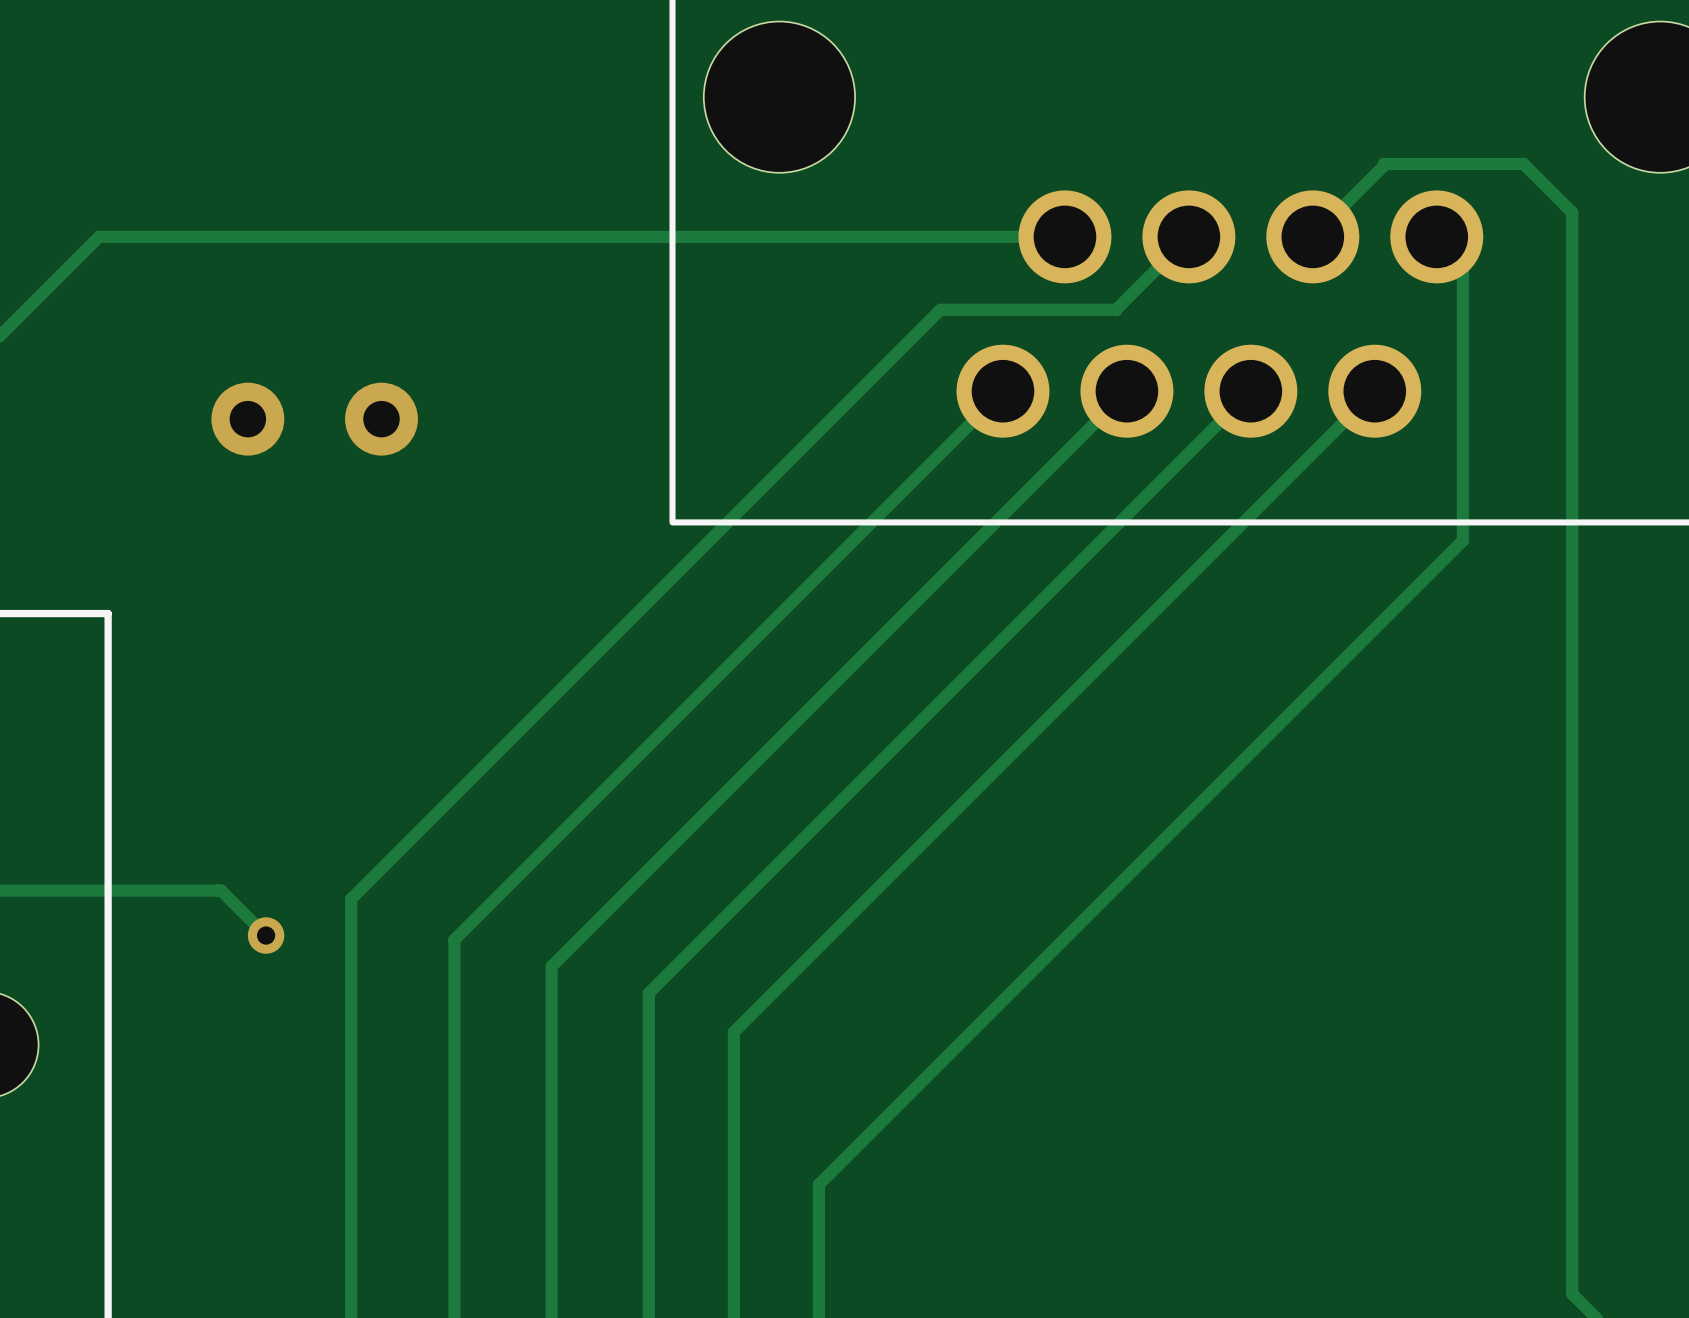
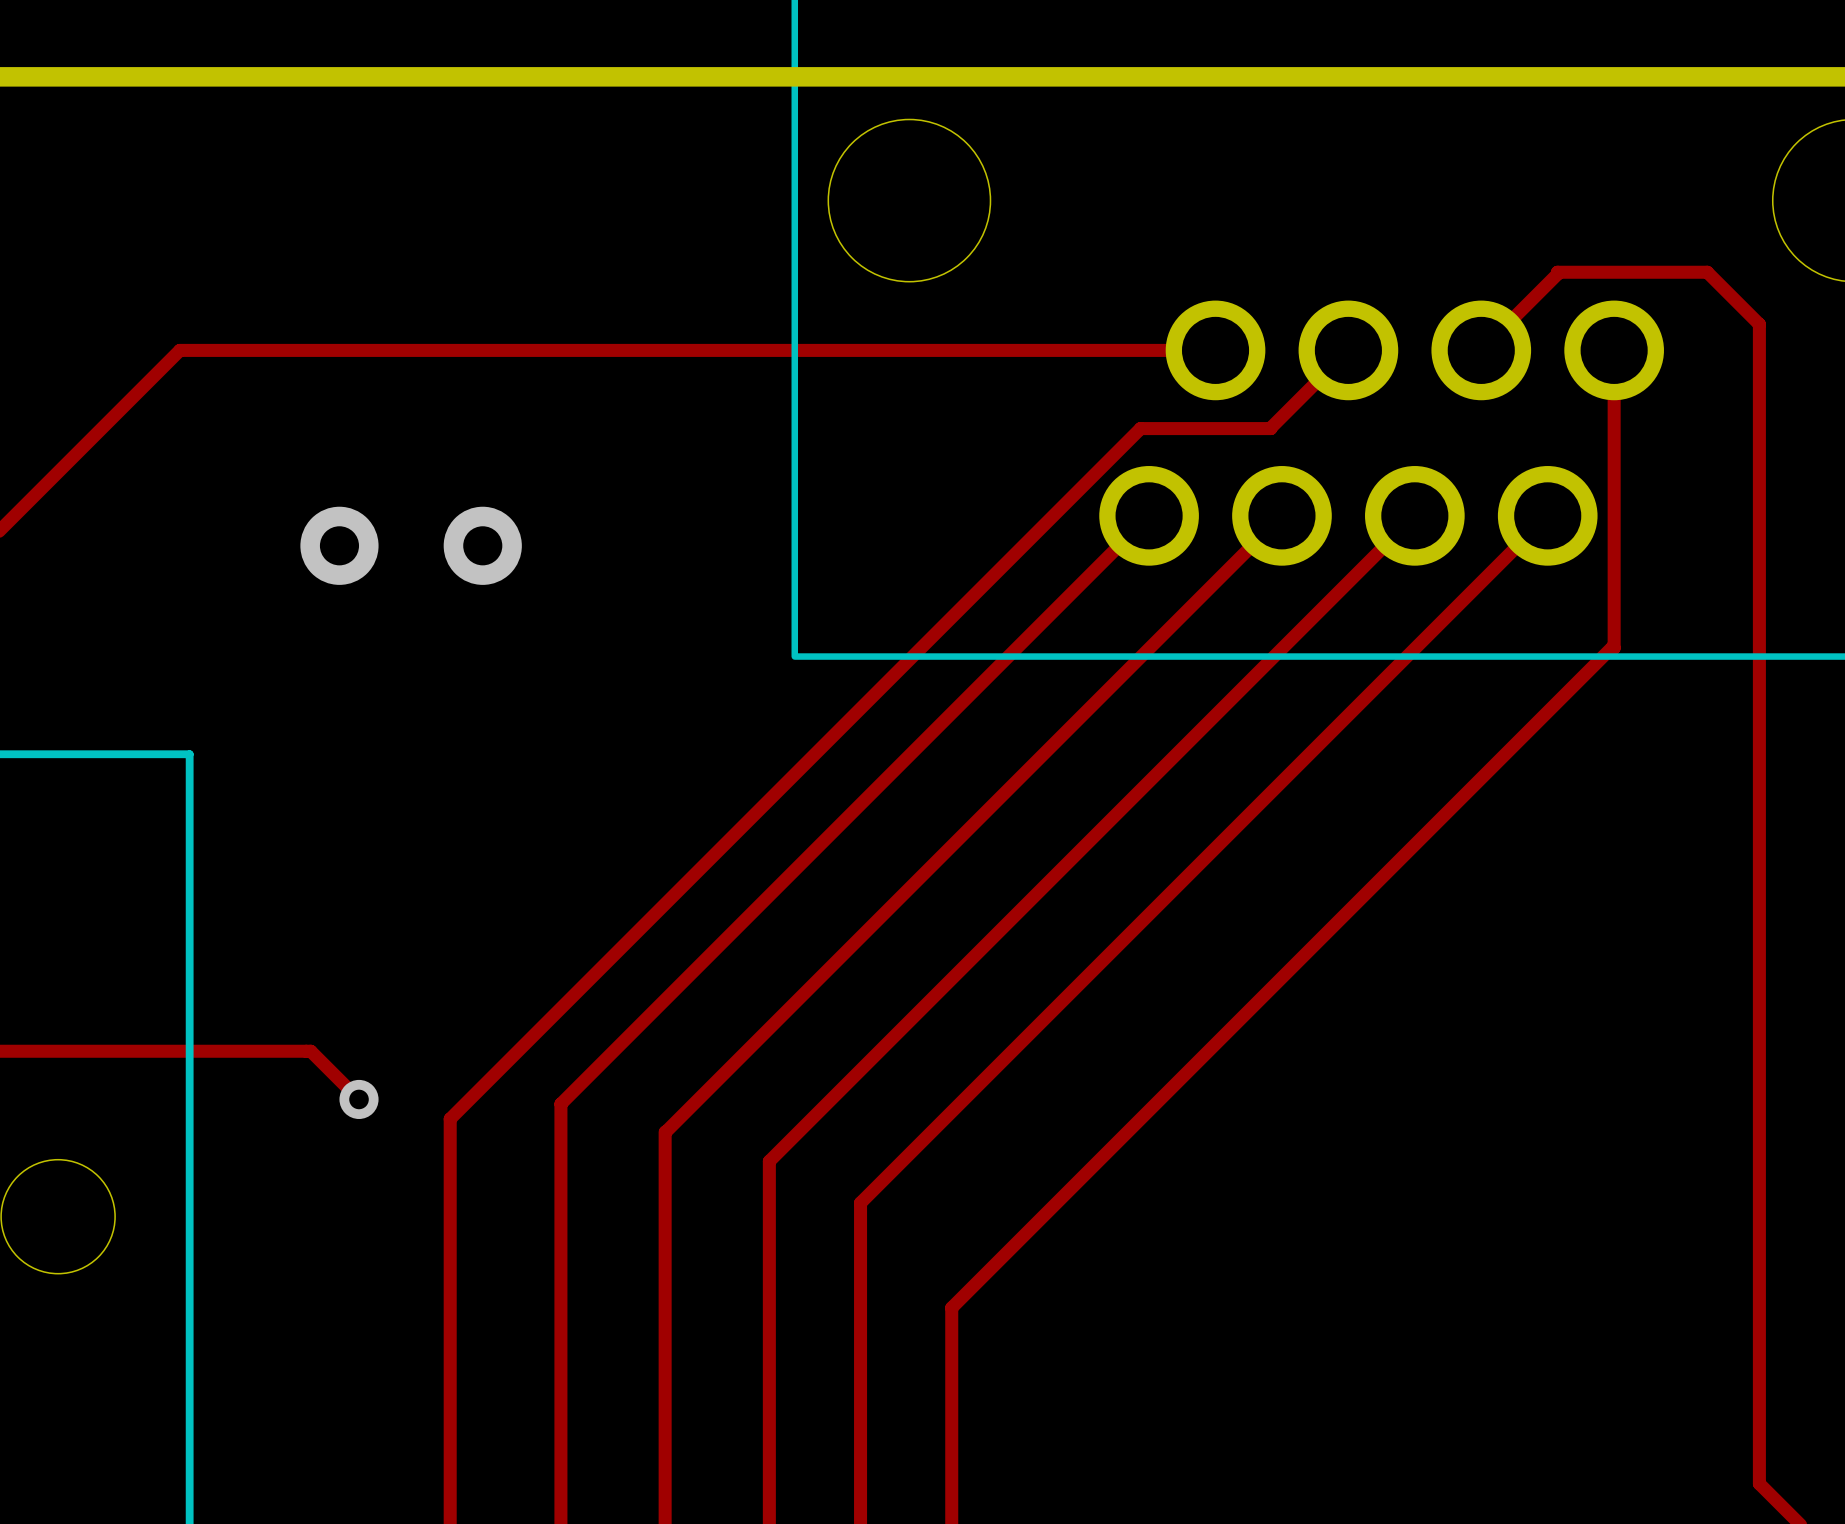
track: (1436, 236) (1462, 263) (1462, 540) (818, 1184) -> (1614, 350) (1614, 648) (1612, 646) (951, 1307) (951, 1366)
track: (995, 309) (940, 309) (351, 899) (351, 953) -> (1140, 428) (450, 1118)

